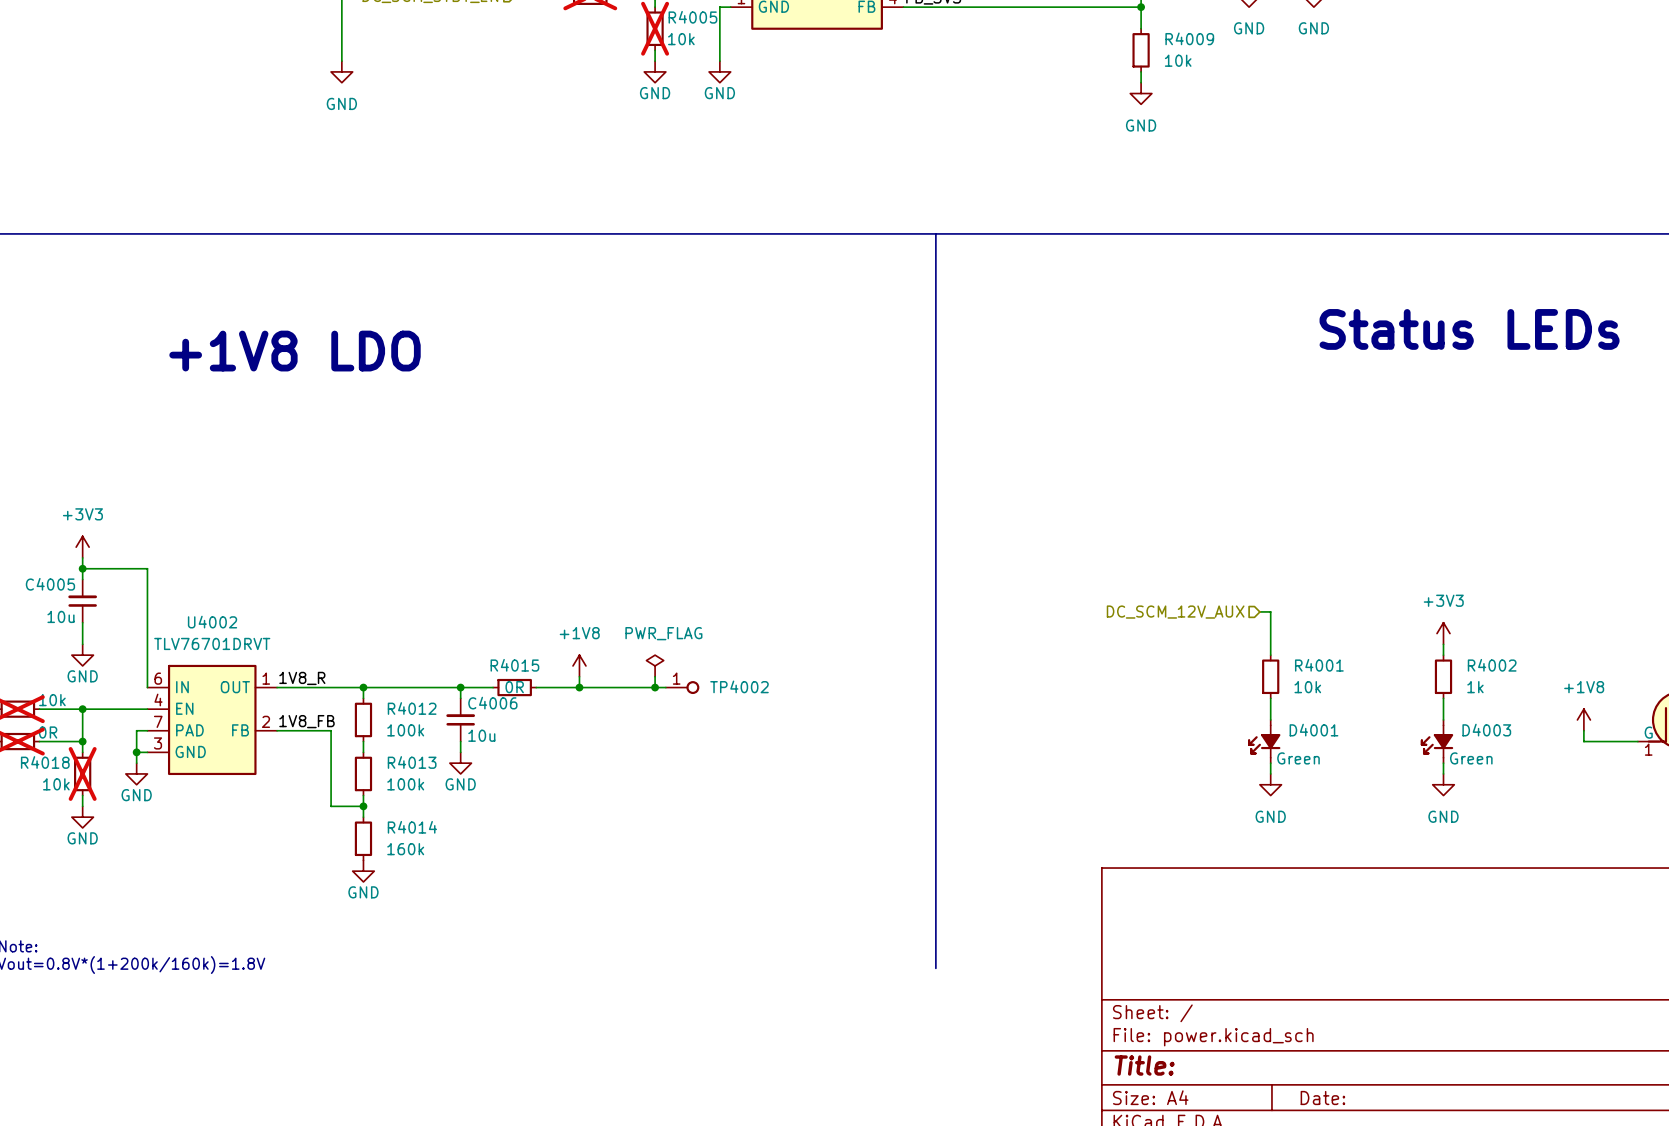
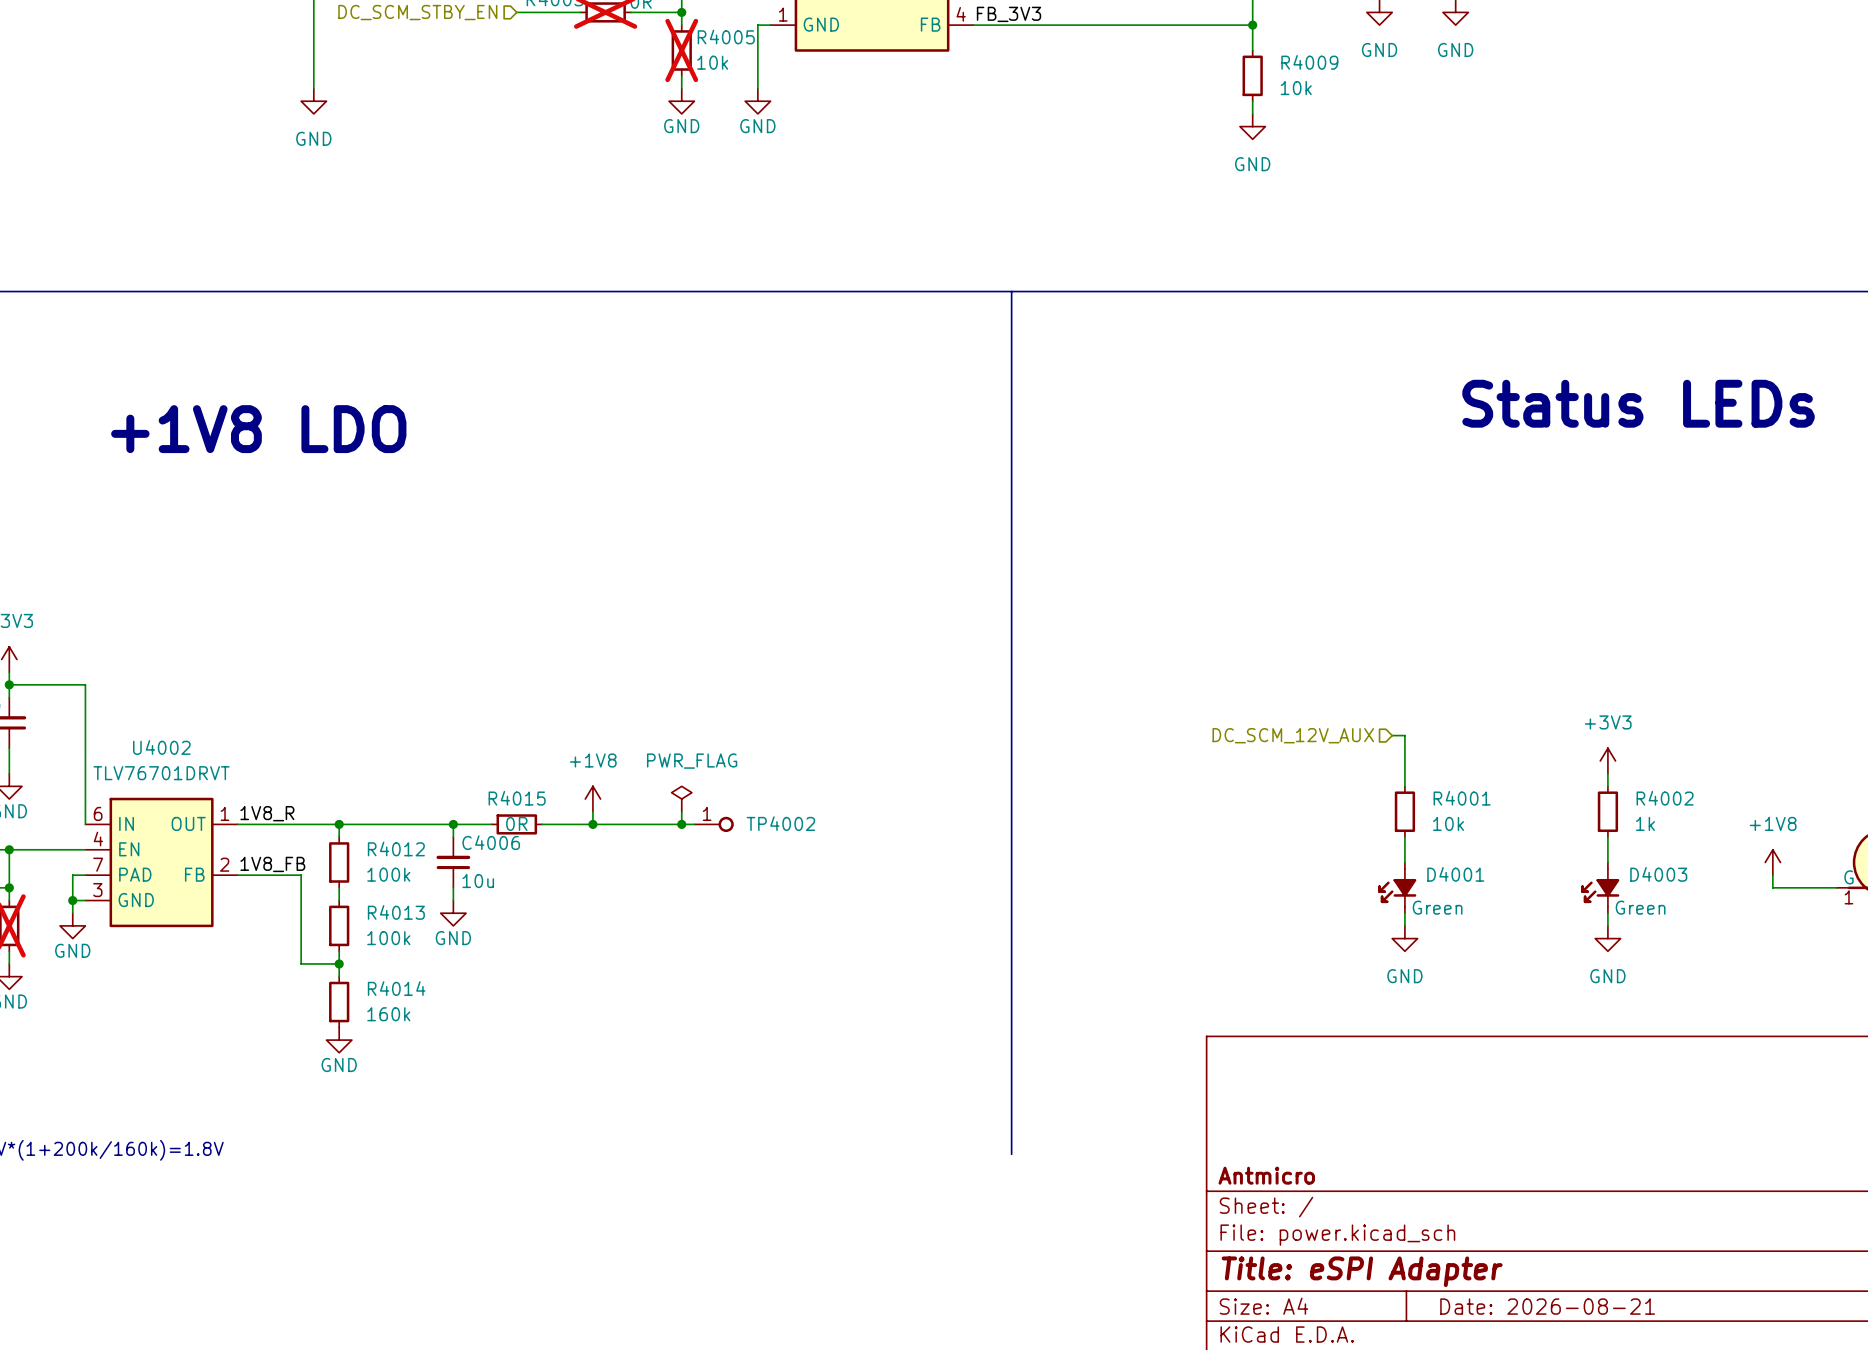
title block: none -> Antmicro (1266, 1175)
title block: Title: (1144, 1065) -> Title: eSPI Adapter (1362, 1271)
title block: Date: (1322, 1098) -> Date: 2026-08-21 (1547, 1306)

